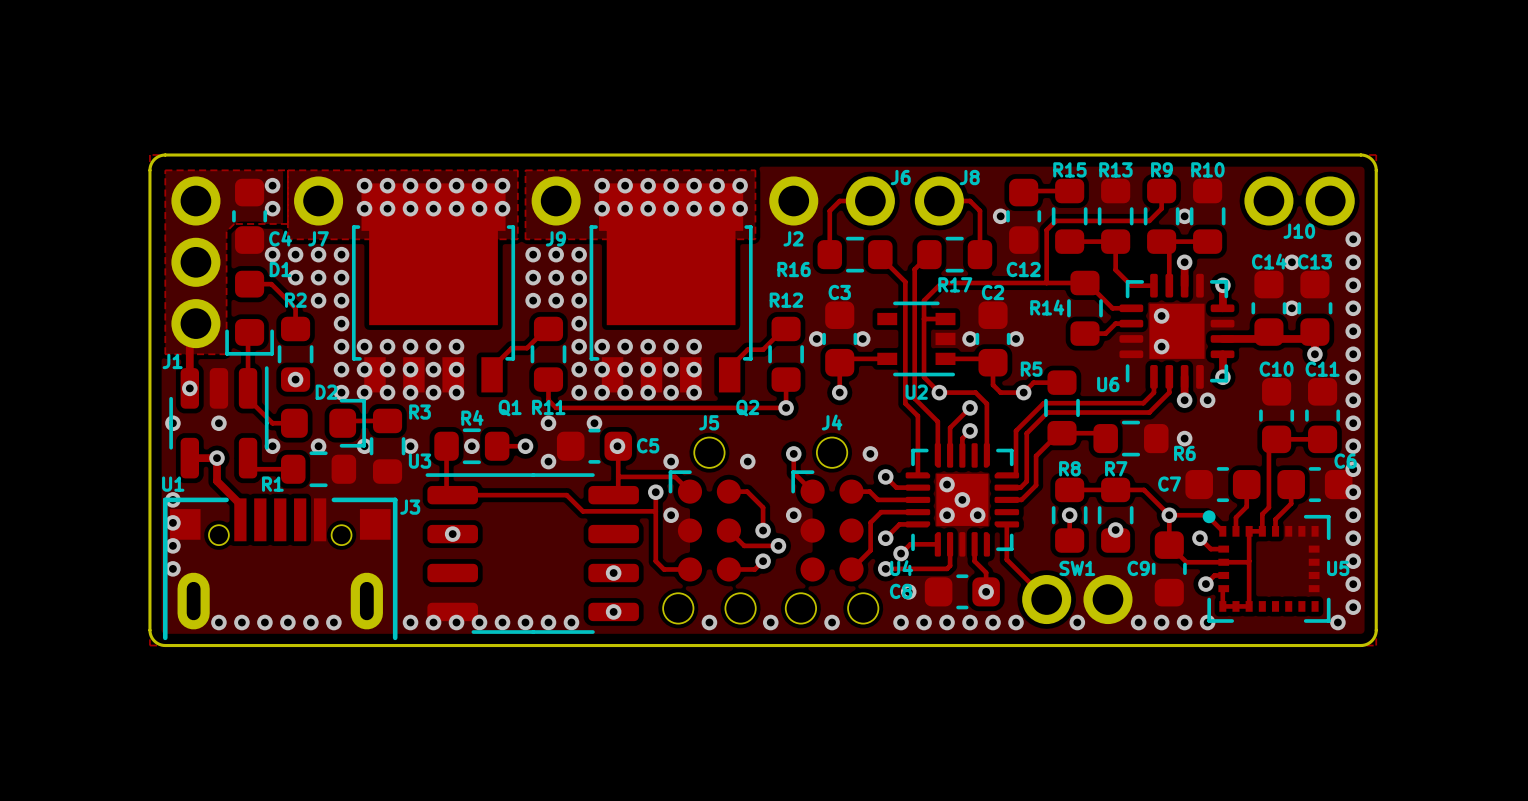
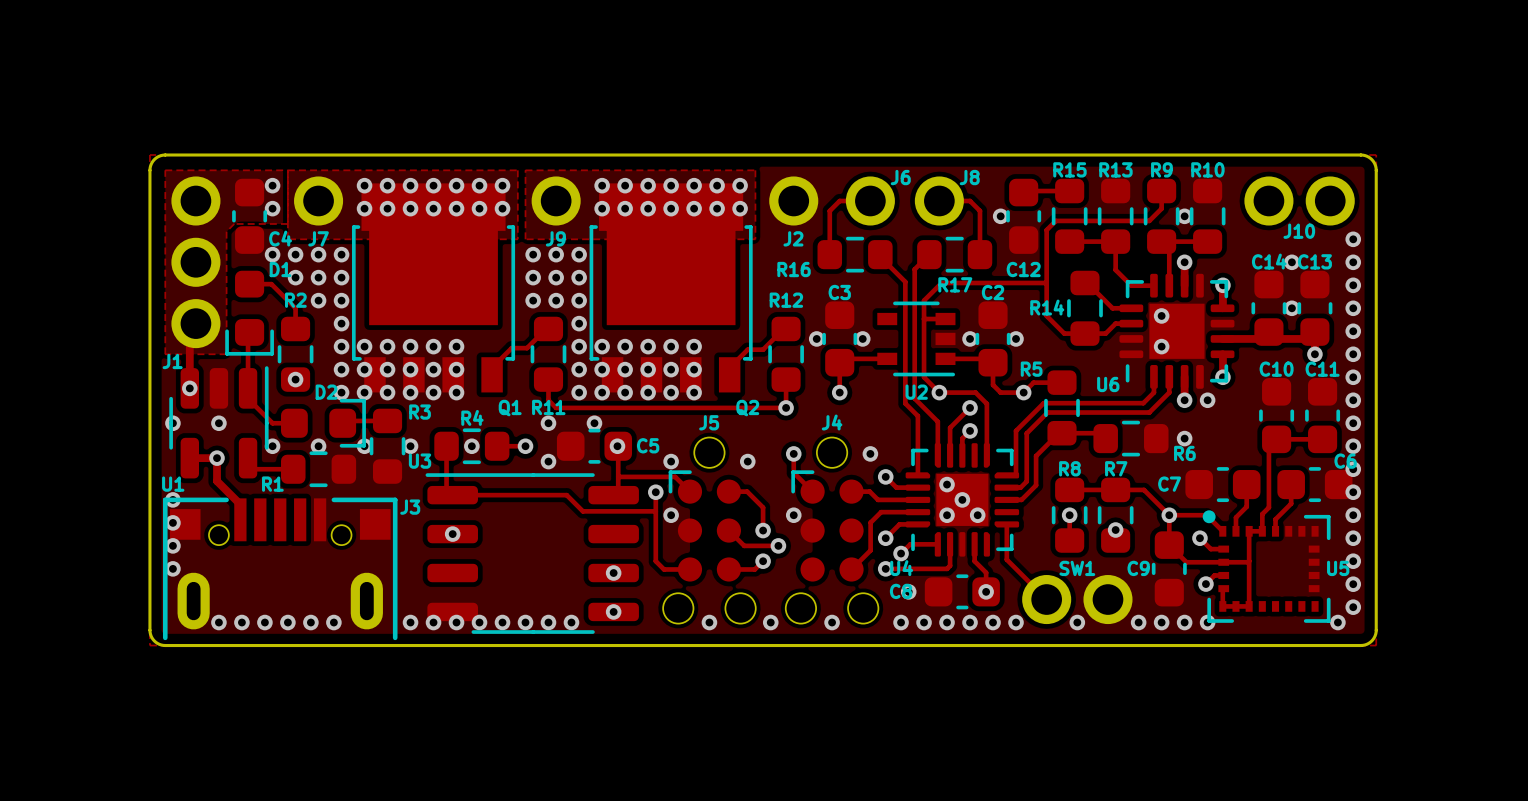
track: (1046, 283) (1084, 283) -> (1046, 283) (1046, 315) (1064, 333) (1084, 333)

